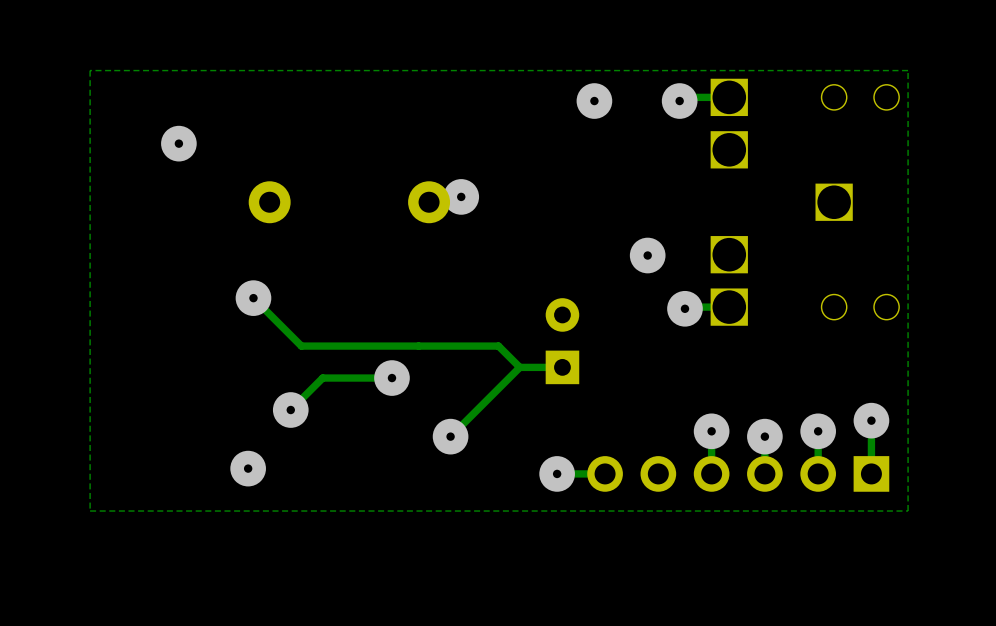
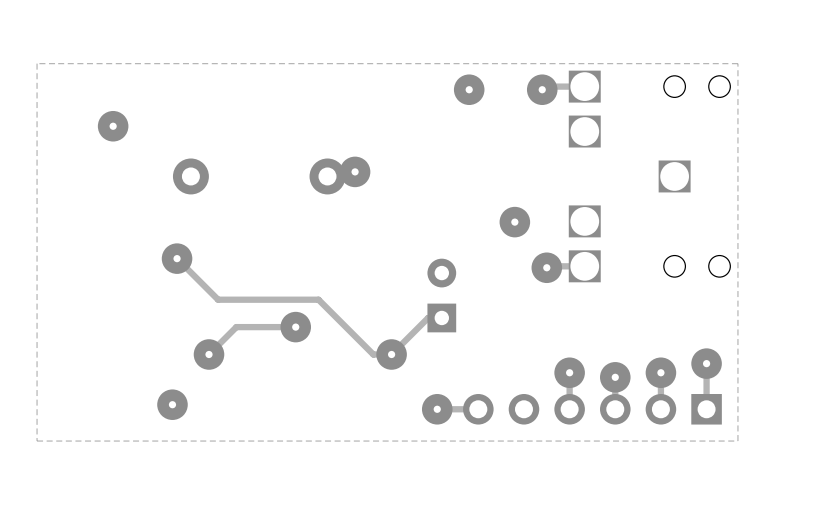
track: (418, 346) (498, 346) (519, 367) -> (318, 299) (373, 354) (391, 354) (428, 317)
track: (519, 367) (450, 436) -> none
track: (546, 367) (519, 367) -> none
via position: (450, 436) -> (391, 354)

